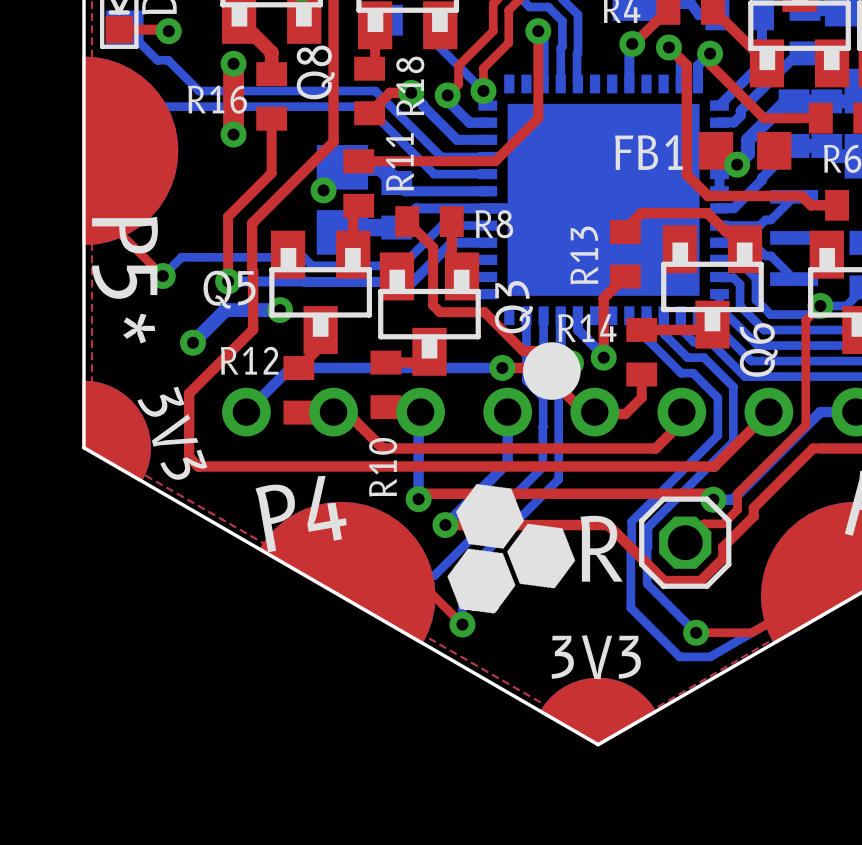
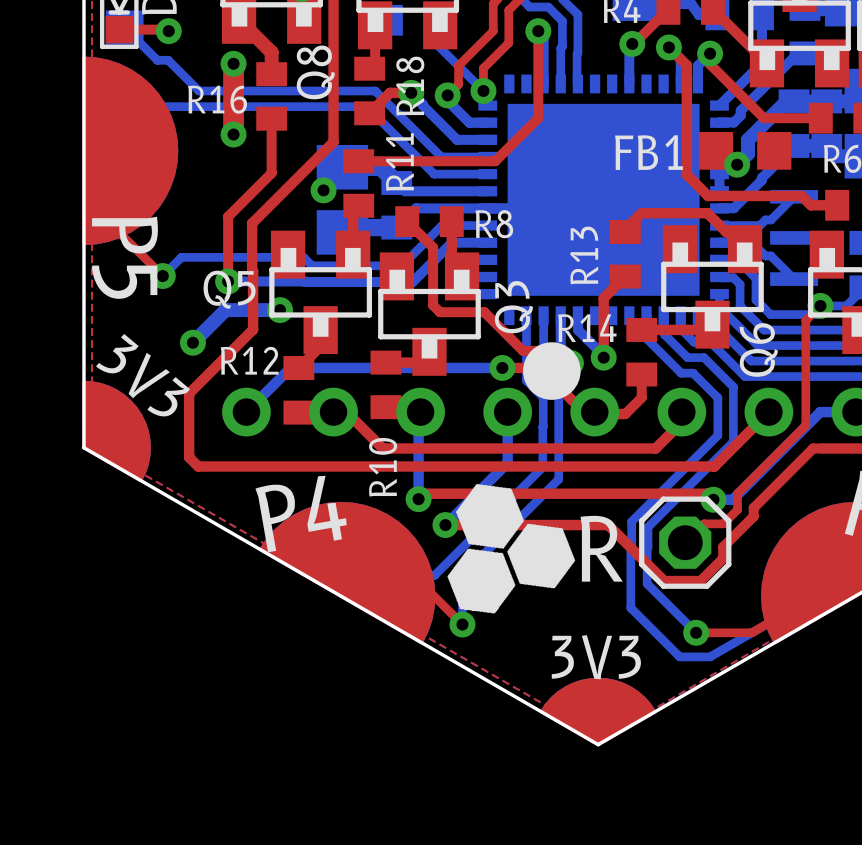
text: P5* (124, 280) -> P5 (124, 257)
text rotation: 0° (172, 433) -> 30° counterclockwise (143, 375)

